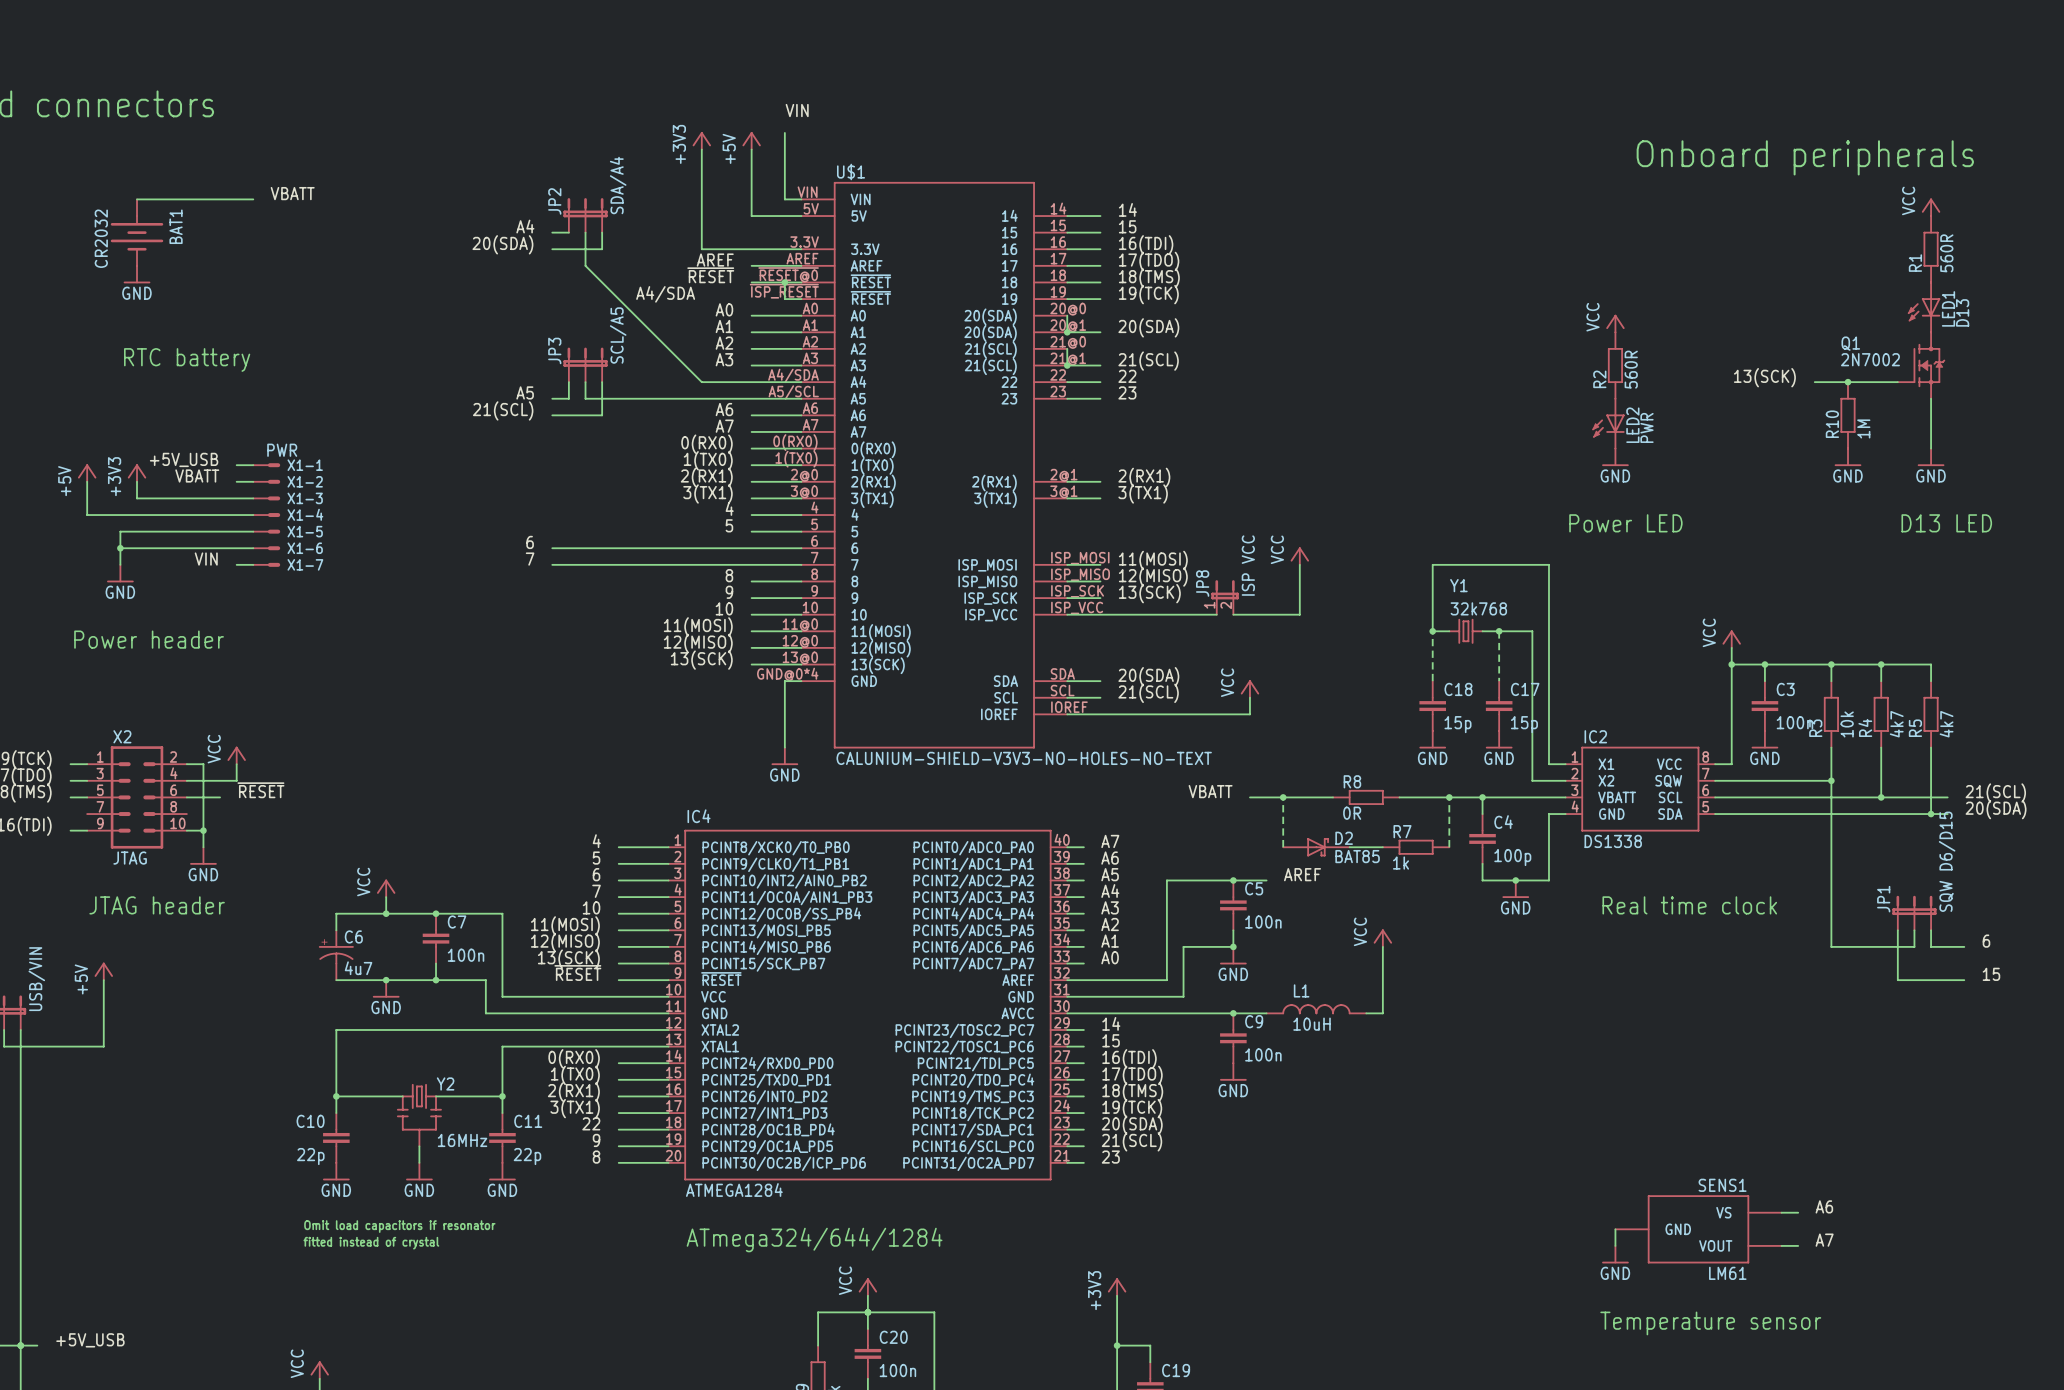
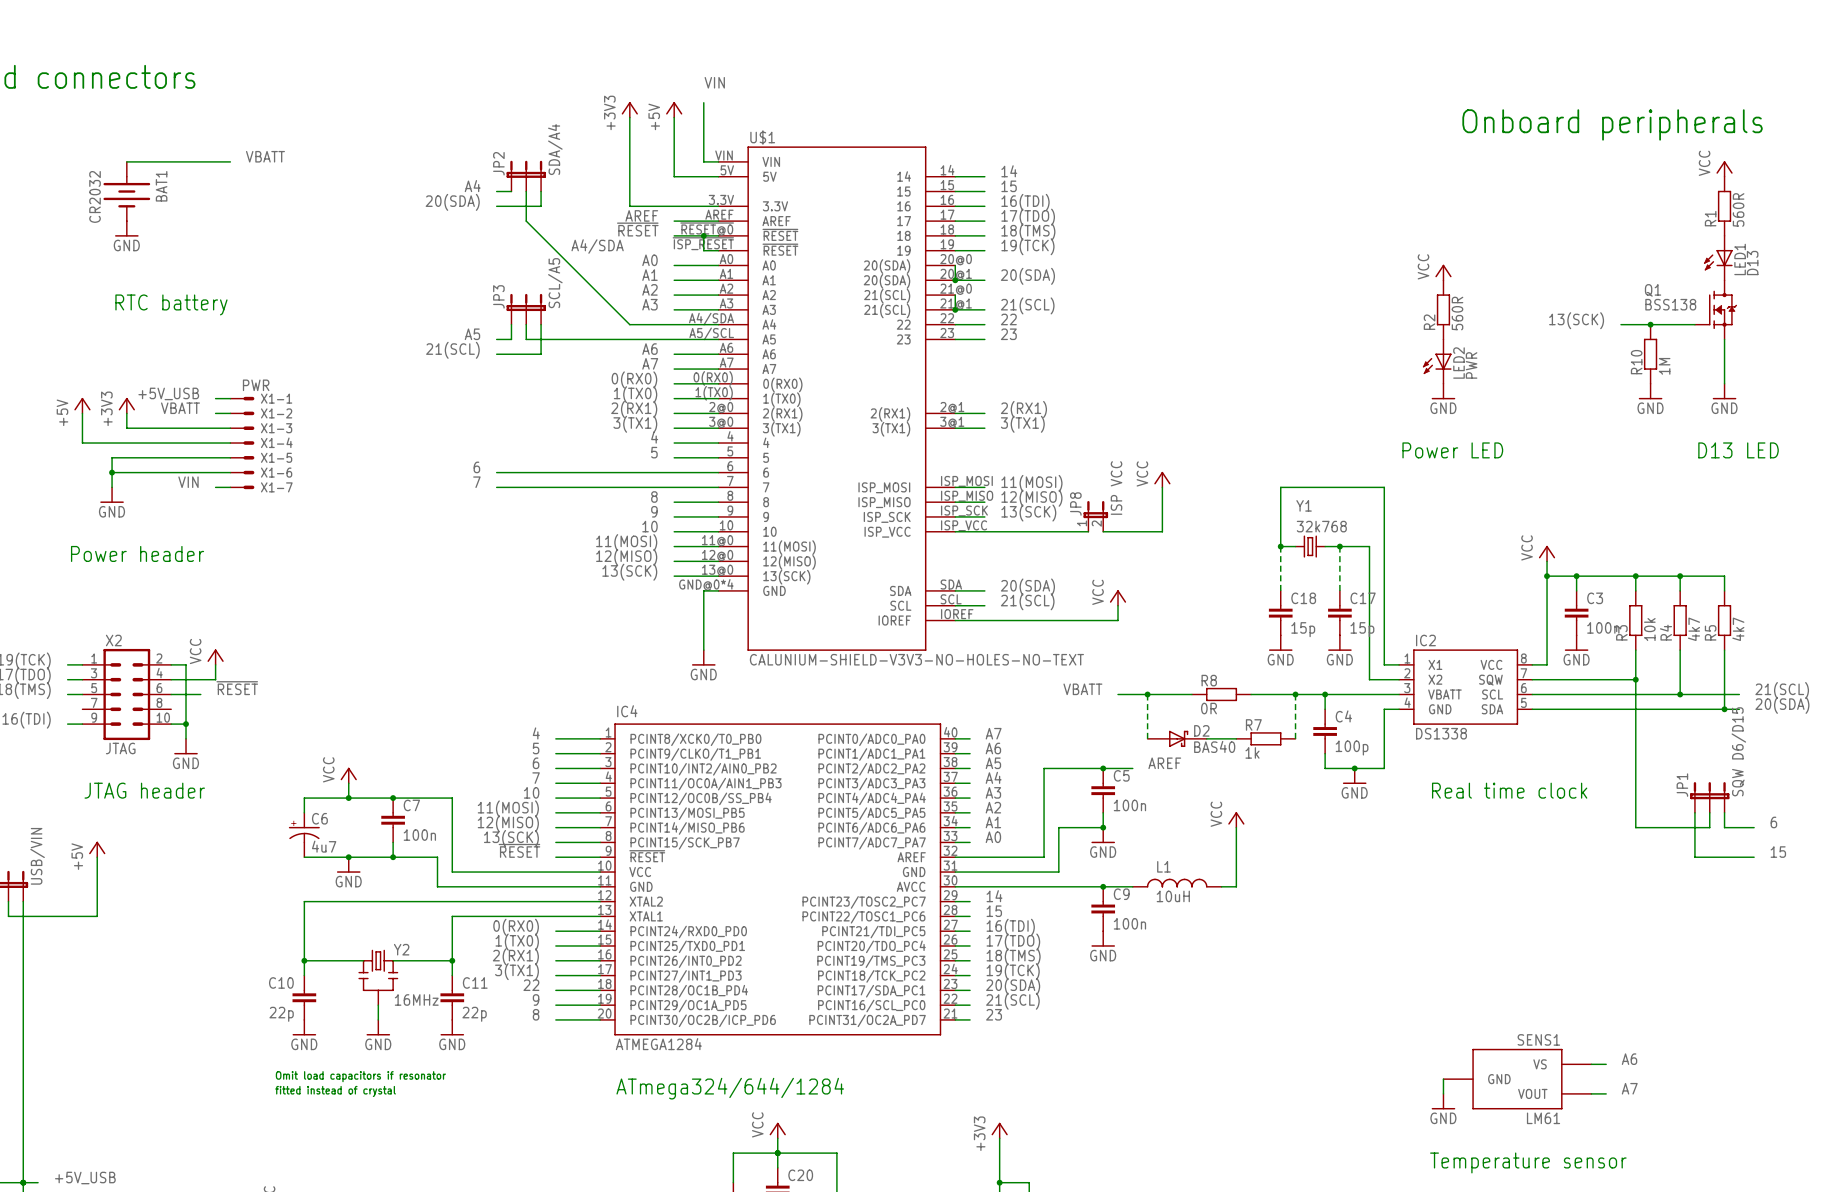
Q1 value: 2N7002 (1870, 359) -> BSS138 (1670, 304)
D2 value: BAT85 (1357, 856) -> BAS40 (1214, 746)

